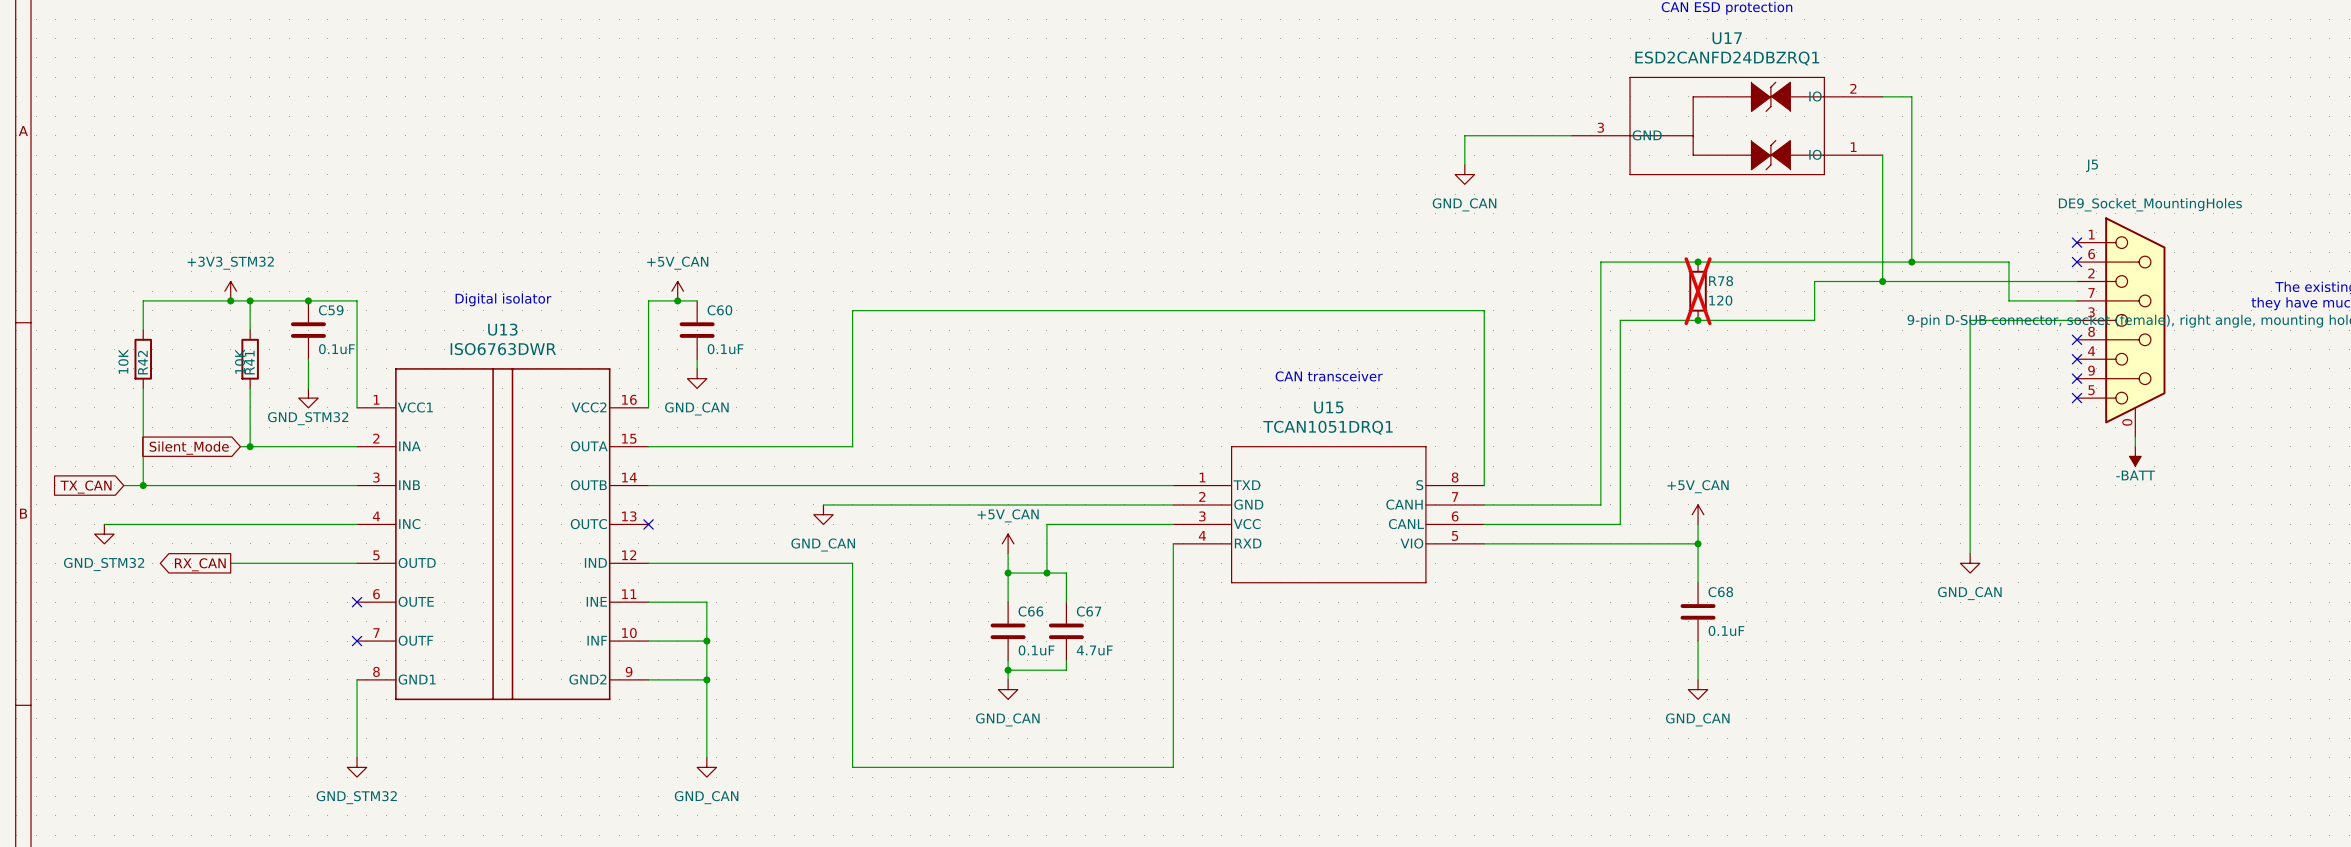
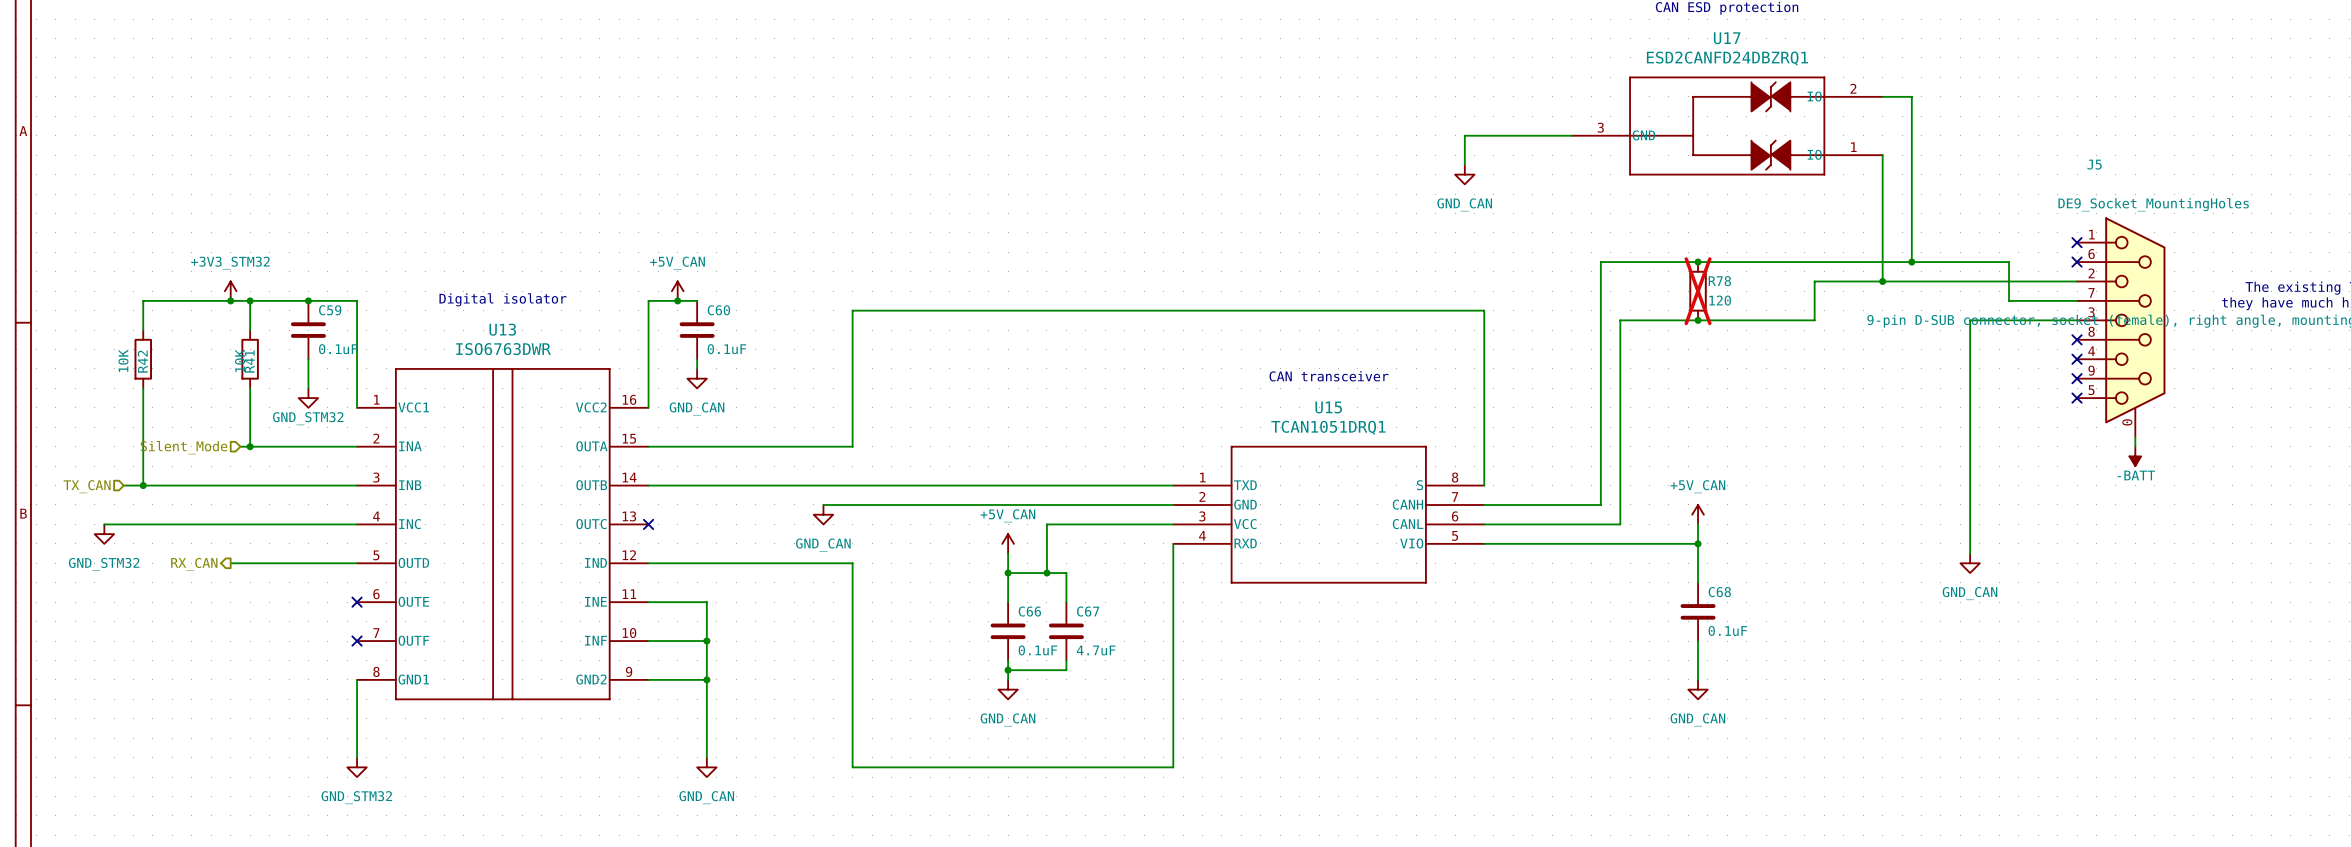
hierarchical label: none -> Silent_Mode (184, 447)
global label: Silent_Mode (189, 448) -> none
hierarchical label: none -> TX_CAN (87, 486)
global label: TX_CAN (86, 487) -> none
hierarchical label: none -> RX_CAN (194, 564)
global label: RX_CAN (200, 564) -> none

